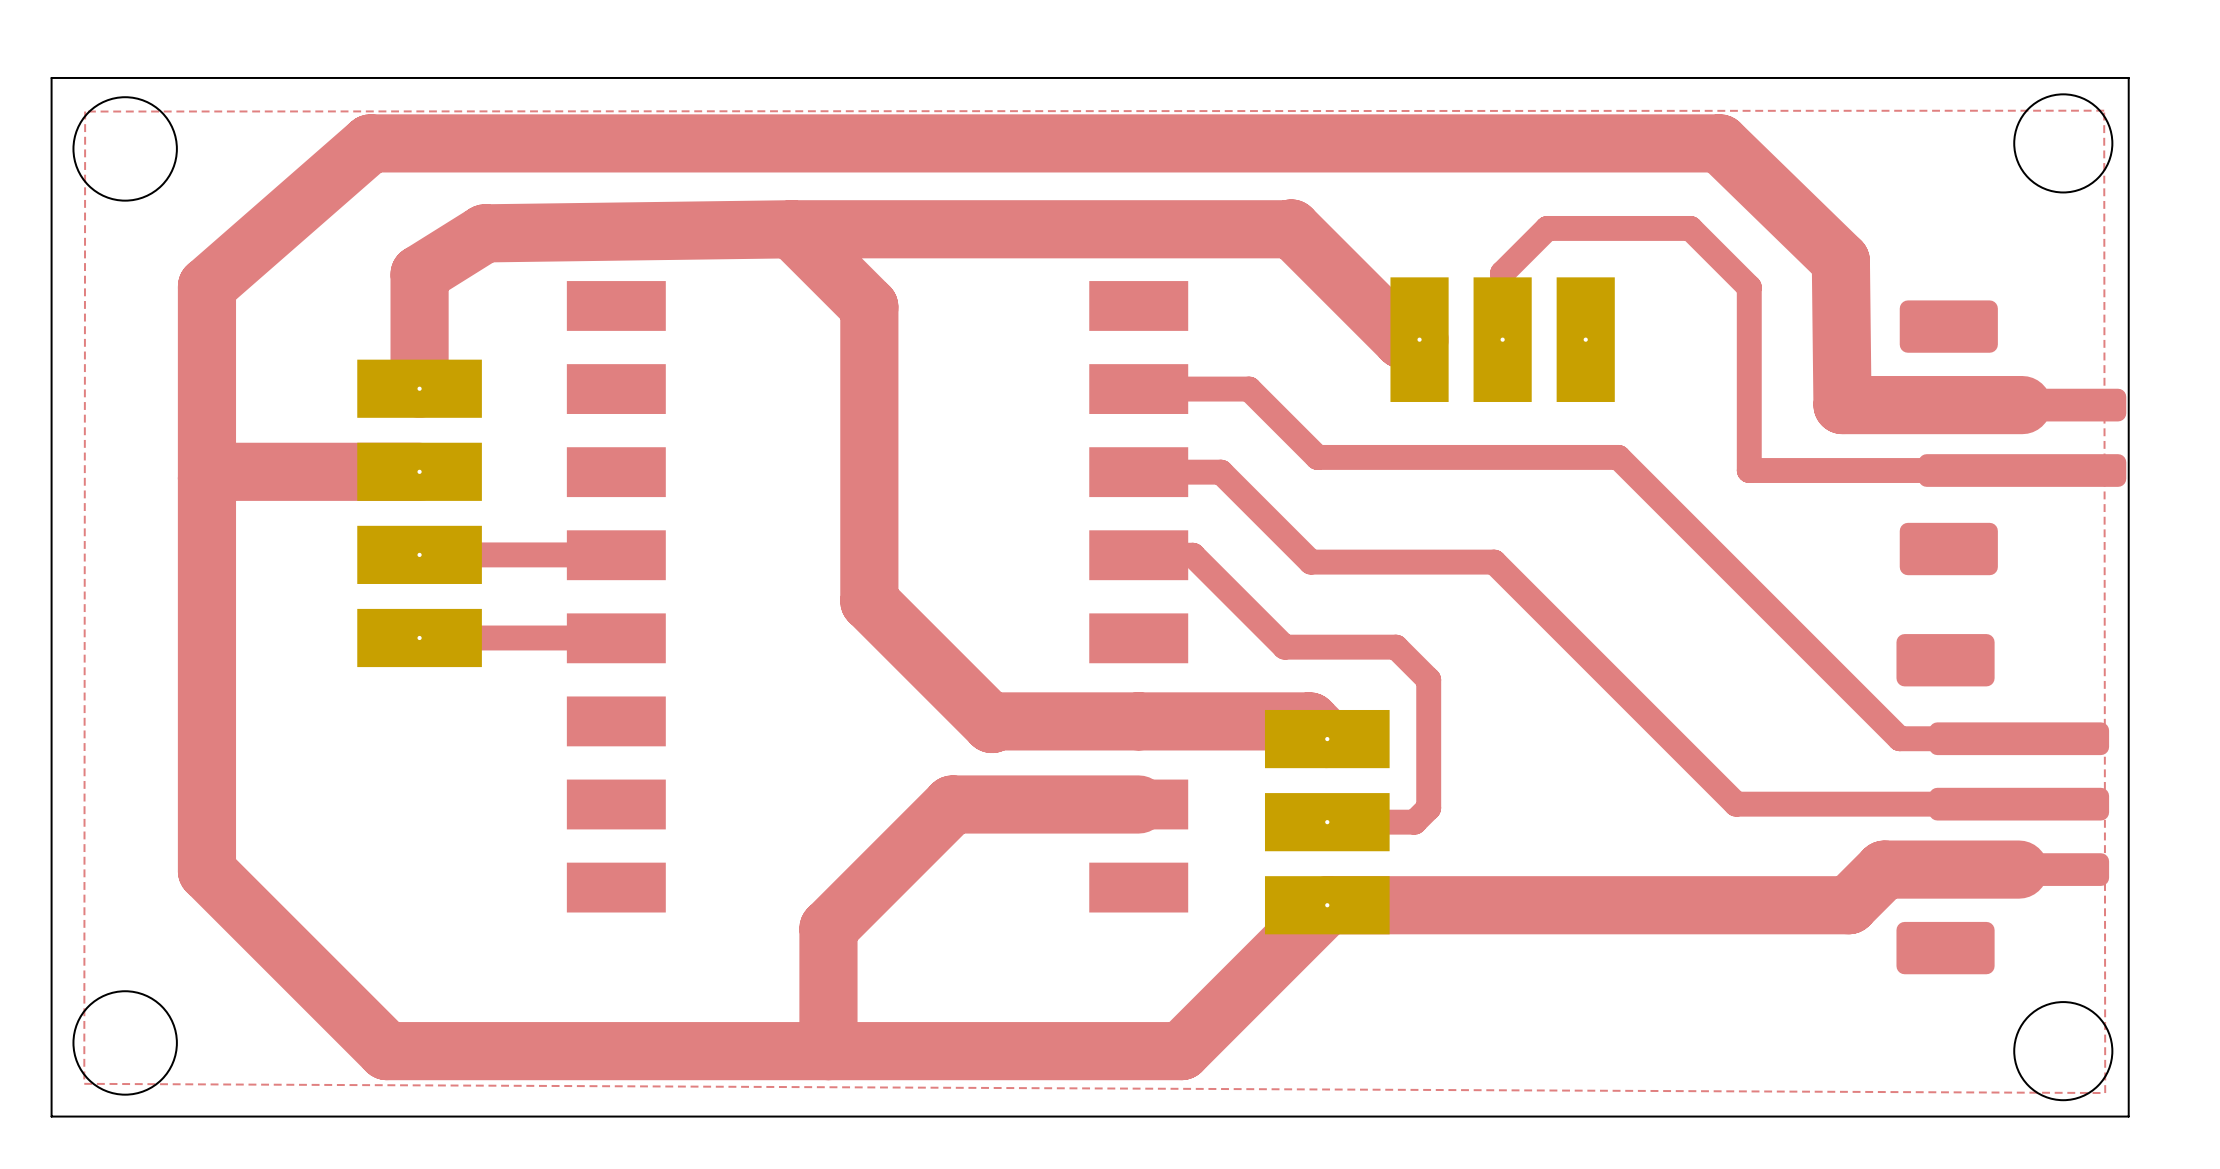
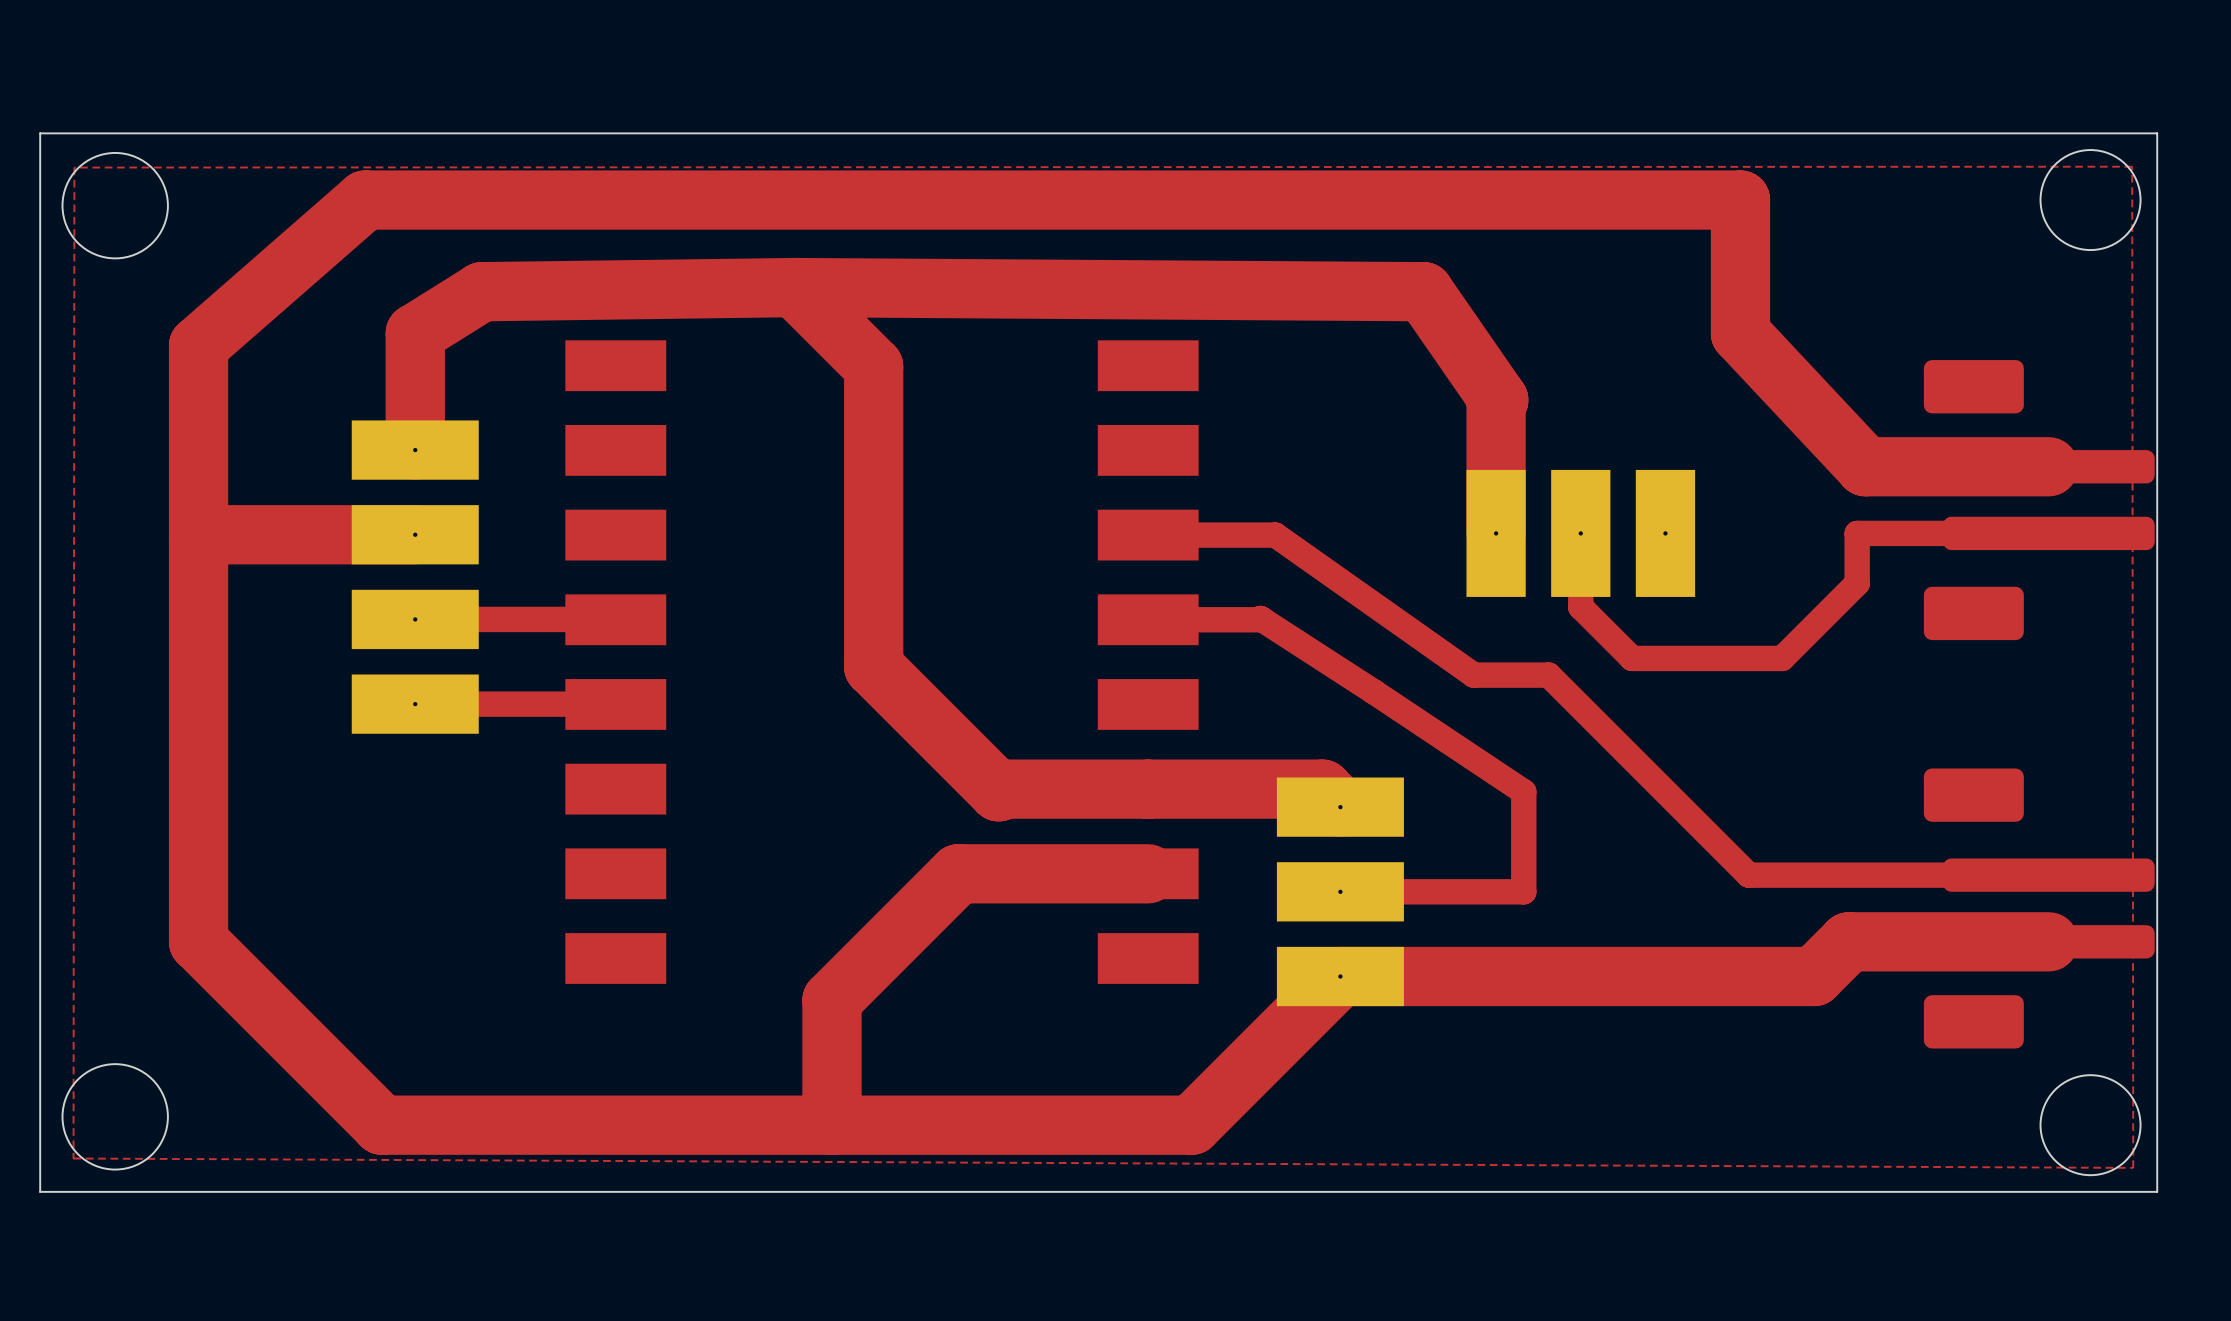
top track: (1719, 143) (1840, 261) (1842, 405) -> (1740, 200) (1740, 333) (1865, 466)
top track: (791, 229) (1291, 228) (1402, 339) (1419, 339) -> (794, 287) (1423, 291) (1498, 400) (1496, 402) (1496, 533)
top track: (1502, 339) (1502, 273) (1547, 228) (1690, 228) (1749, 287) (1749, 470) (1834, 470) -> (1580, 533) (1580, 607) (1632, 658) (1782, 658) (1857, 583) (1857, 533)
part position: (1502, 339) -> (1580, 533)
top track: (1138, 389) (1249, 389) (1317, 457) (1618, 457) (1899, 738) (2019, 738) -> none
top track: (1220, 472) (1310, 562) (1494, 562) (1736, 804) (2019, 804) -> (1232, 535) (1275, 535) (1473, 675) (1548, 675) (1748, 875) (2048, 875)
top track: (1192, 555) (1284, 647) (1396, 647) (1428, 679) (1428, 807) (1414, 822) -> (1203, 619) (1262, 619) (1260, 618) (1523, 791) (1523, 891) (1429, 891)
part: (2002, 804) -> none
part: none -> (2039, 908)
top track: (2019, 869) (1884, 869) (1848, 905) (1792, 905) -> (2048, 941) (1848, 941) (1814, 976)

